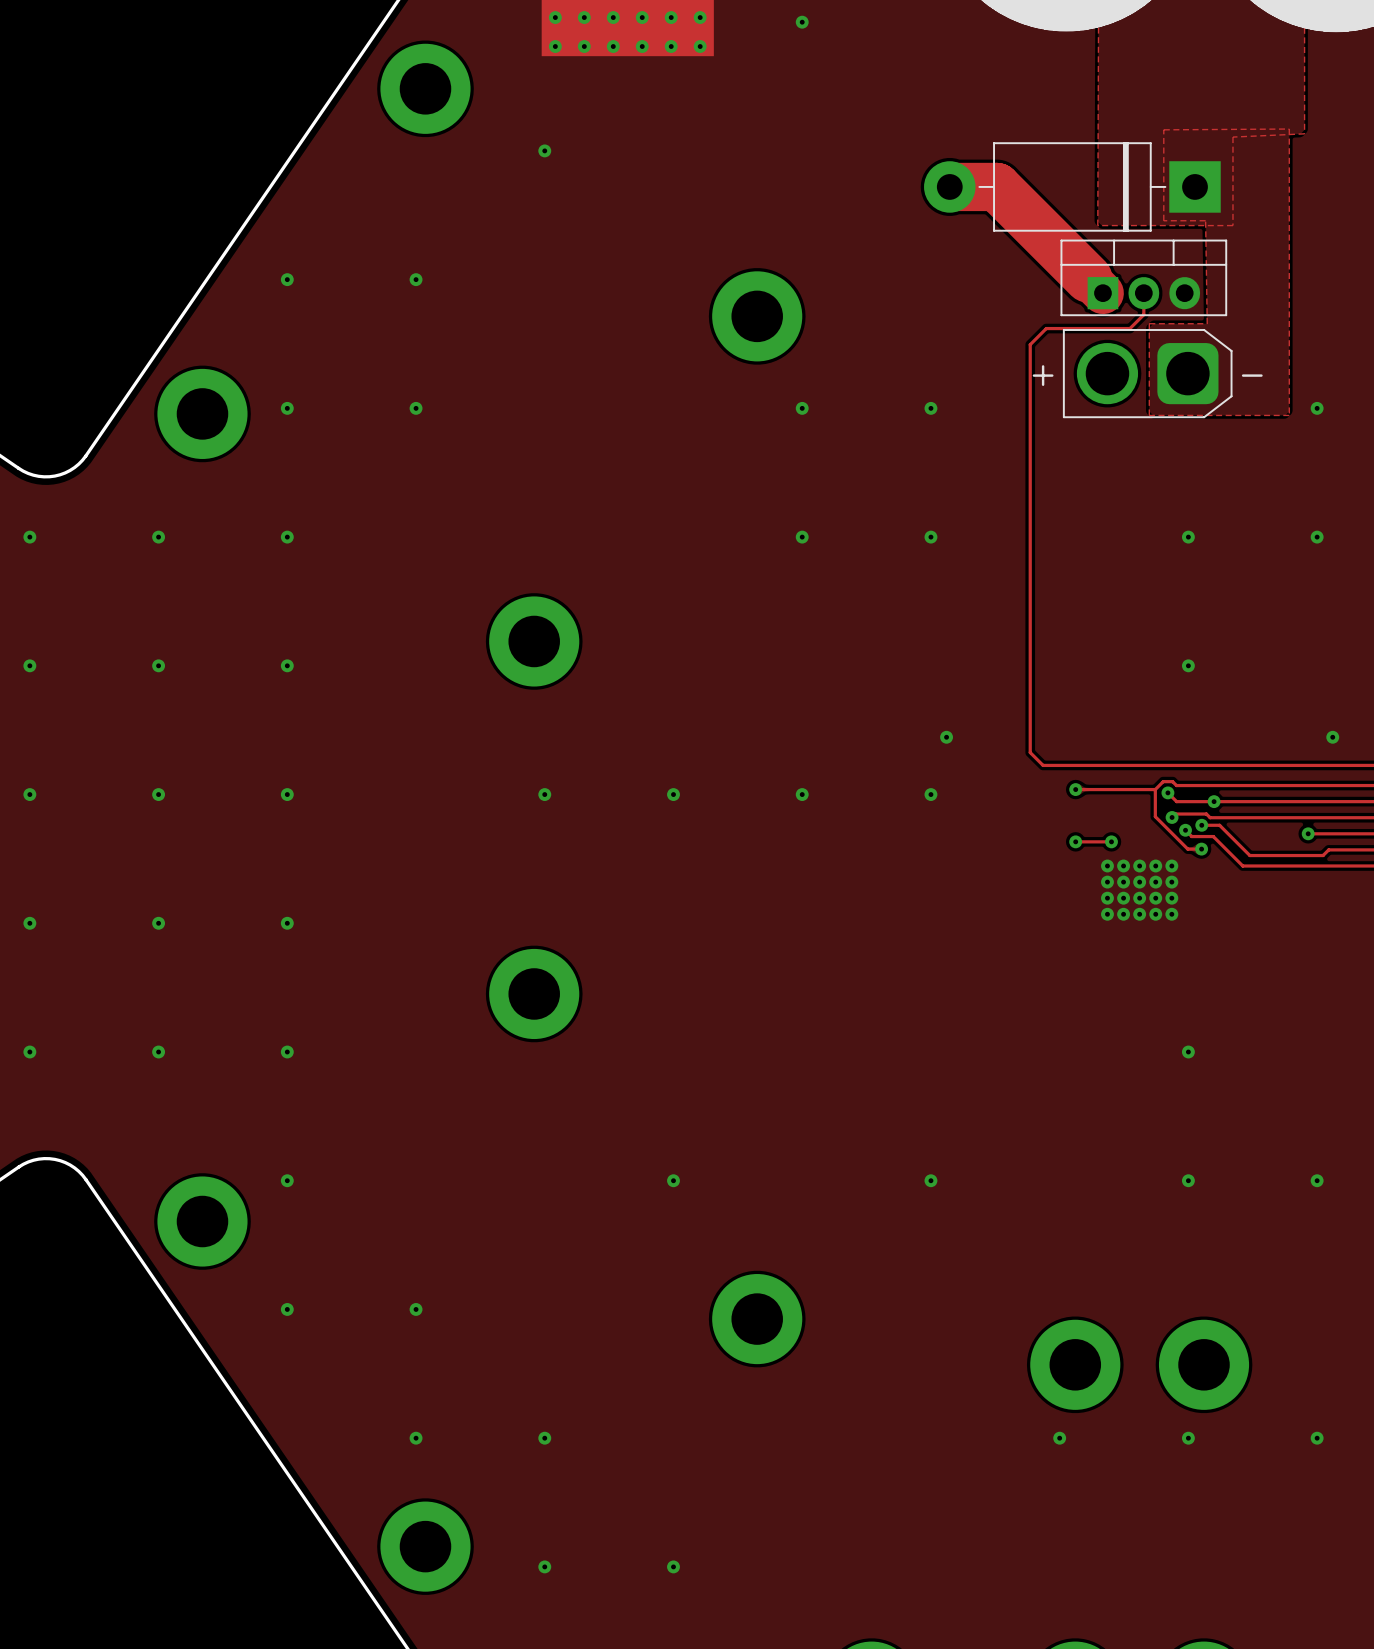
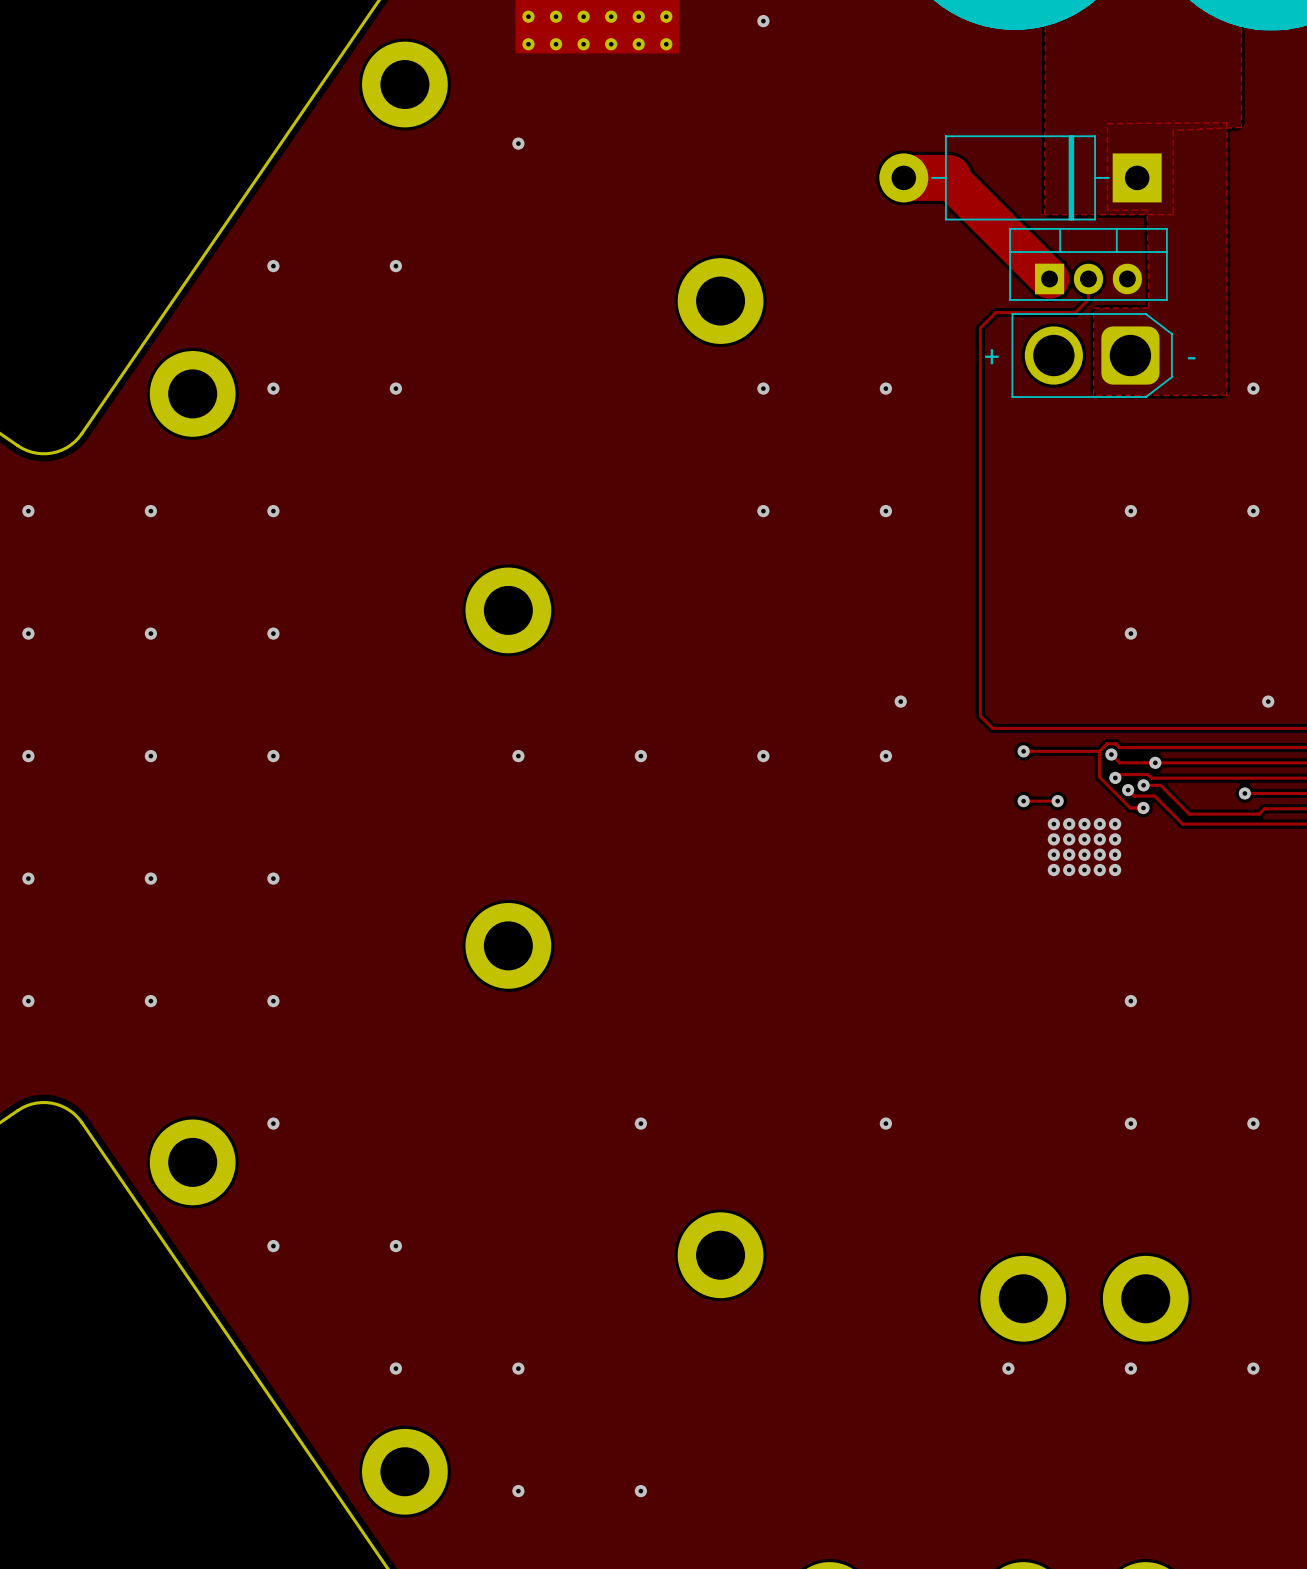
track width: thick (996, 186) (1088, 278) -> thin (948, 177) (1035, 265)

